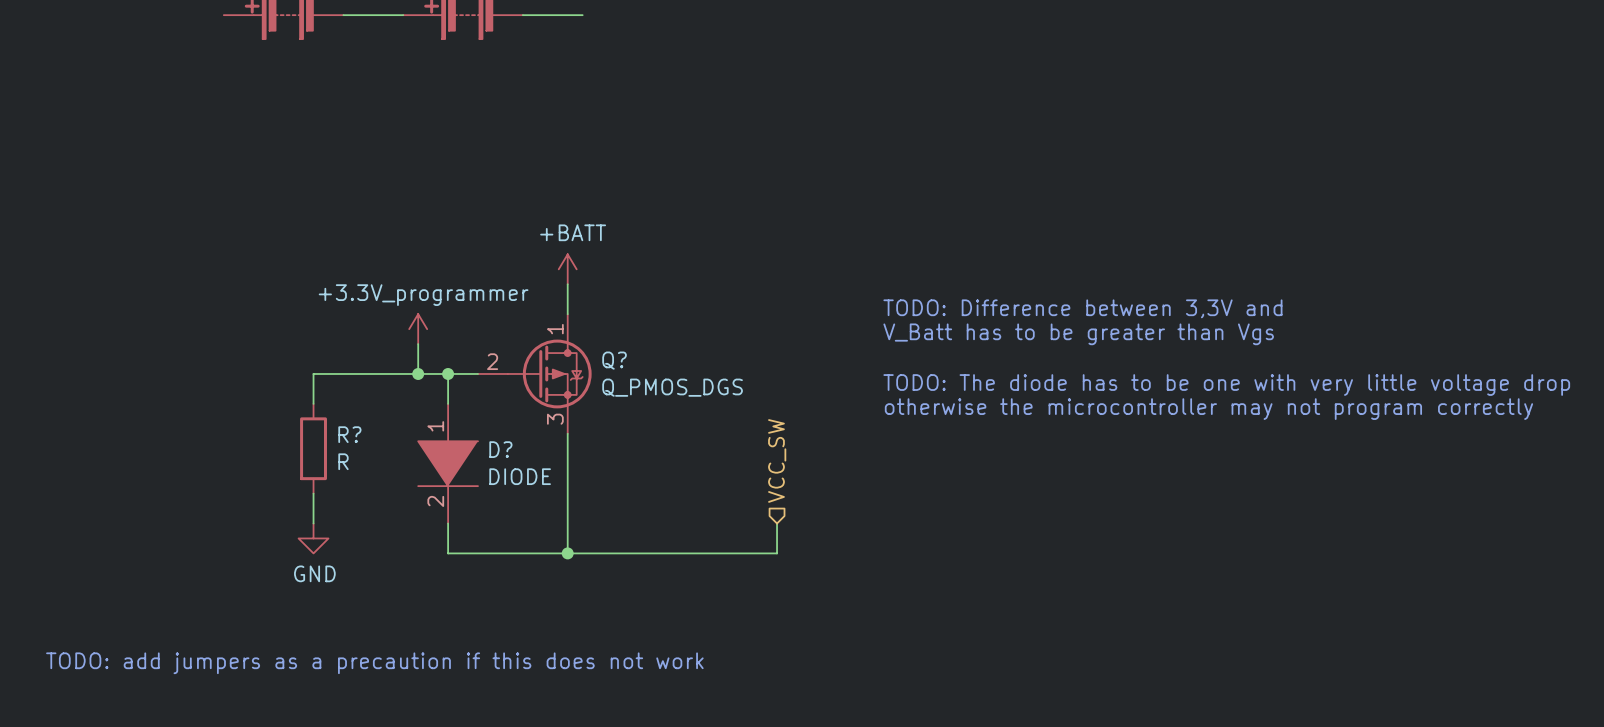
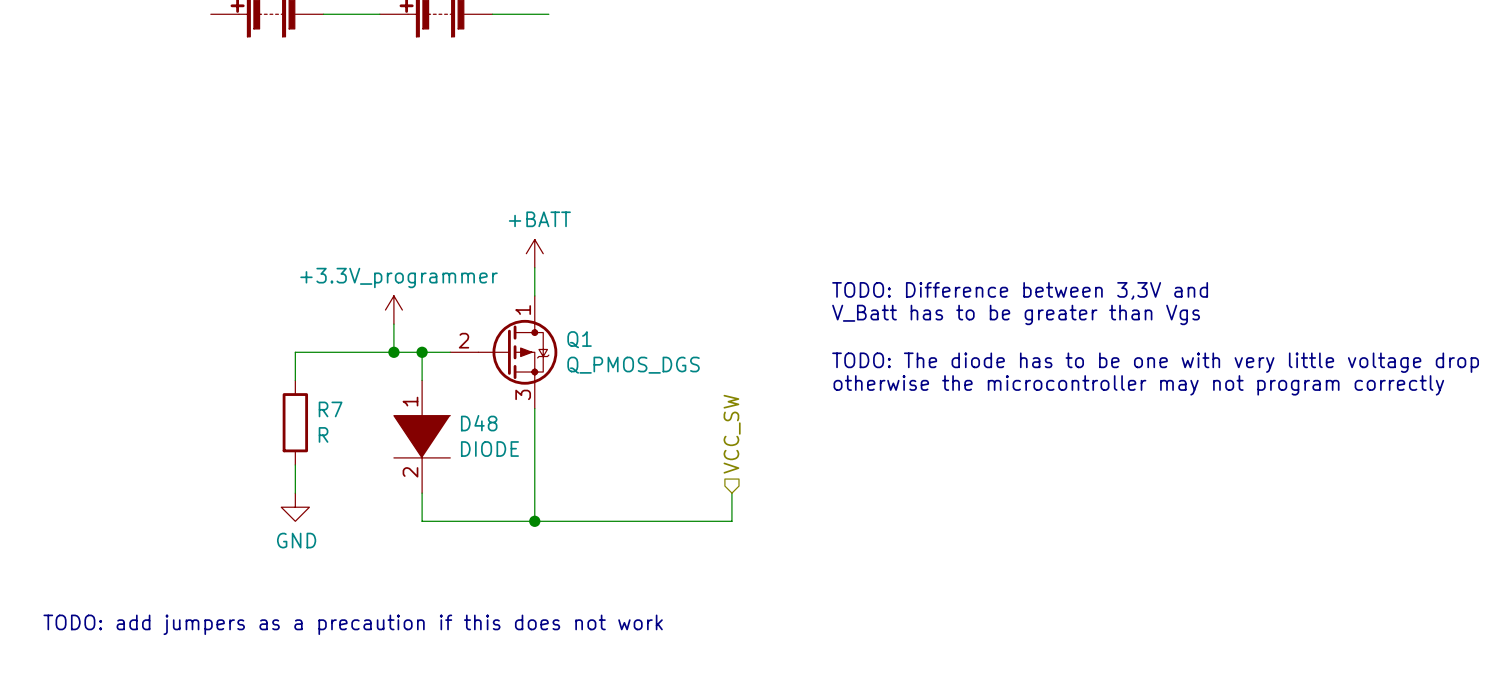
Q? name: Q? (614, 360) -> Q1 (579, 339)
R? name: R? (349, 434) -> R7 (330, 409)
D? name: D? (500, 449) -> D48 (479, 423)

